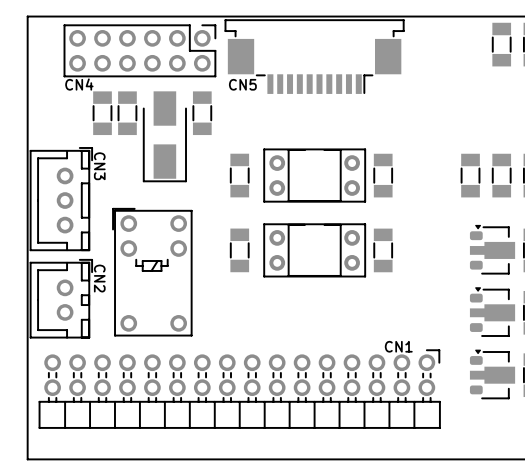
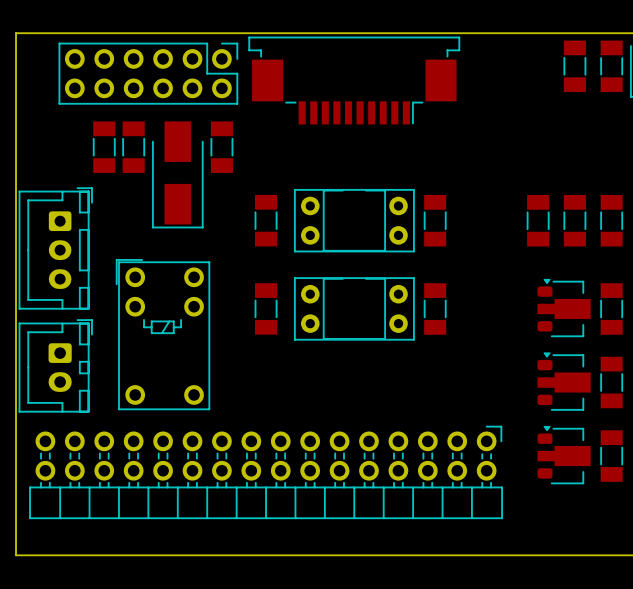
text: CN4 (79, 84) -> none
text: CN5 (242, 84) -> none
part footprint: [30, 147, 93, 251] -> [18, 187, 93, 310]
text: CN3 (99, 166) -> none
part footprint: [30, 259, 93, 339] -> [18, 319, 93, 413]
text: CN2 (99, 278) -> none
text: CN1 (398, 346) -> none

